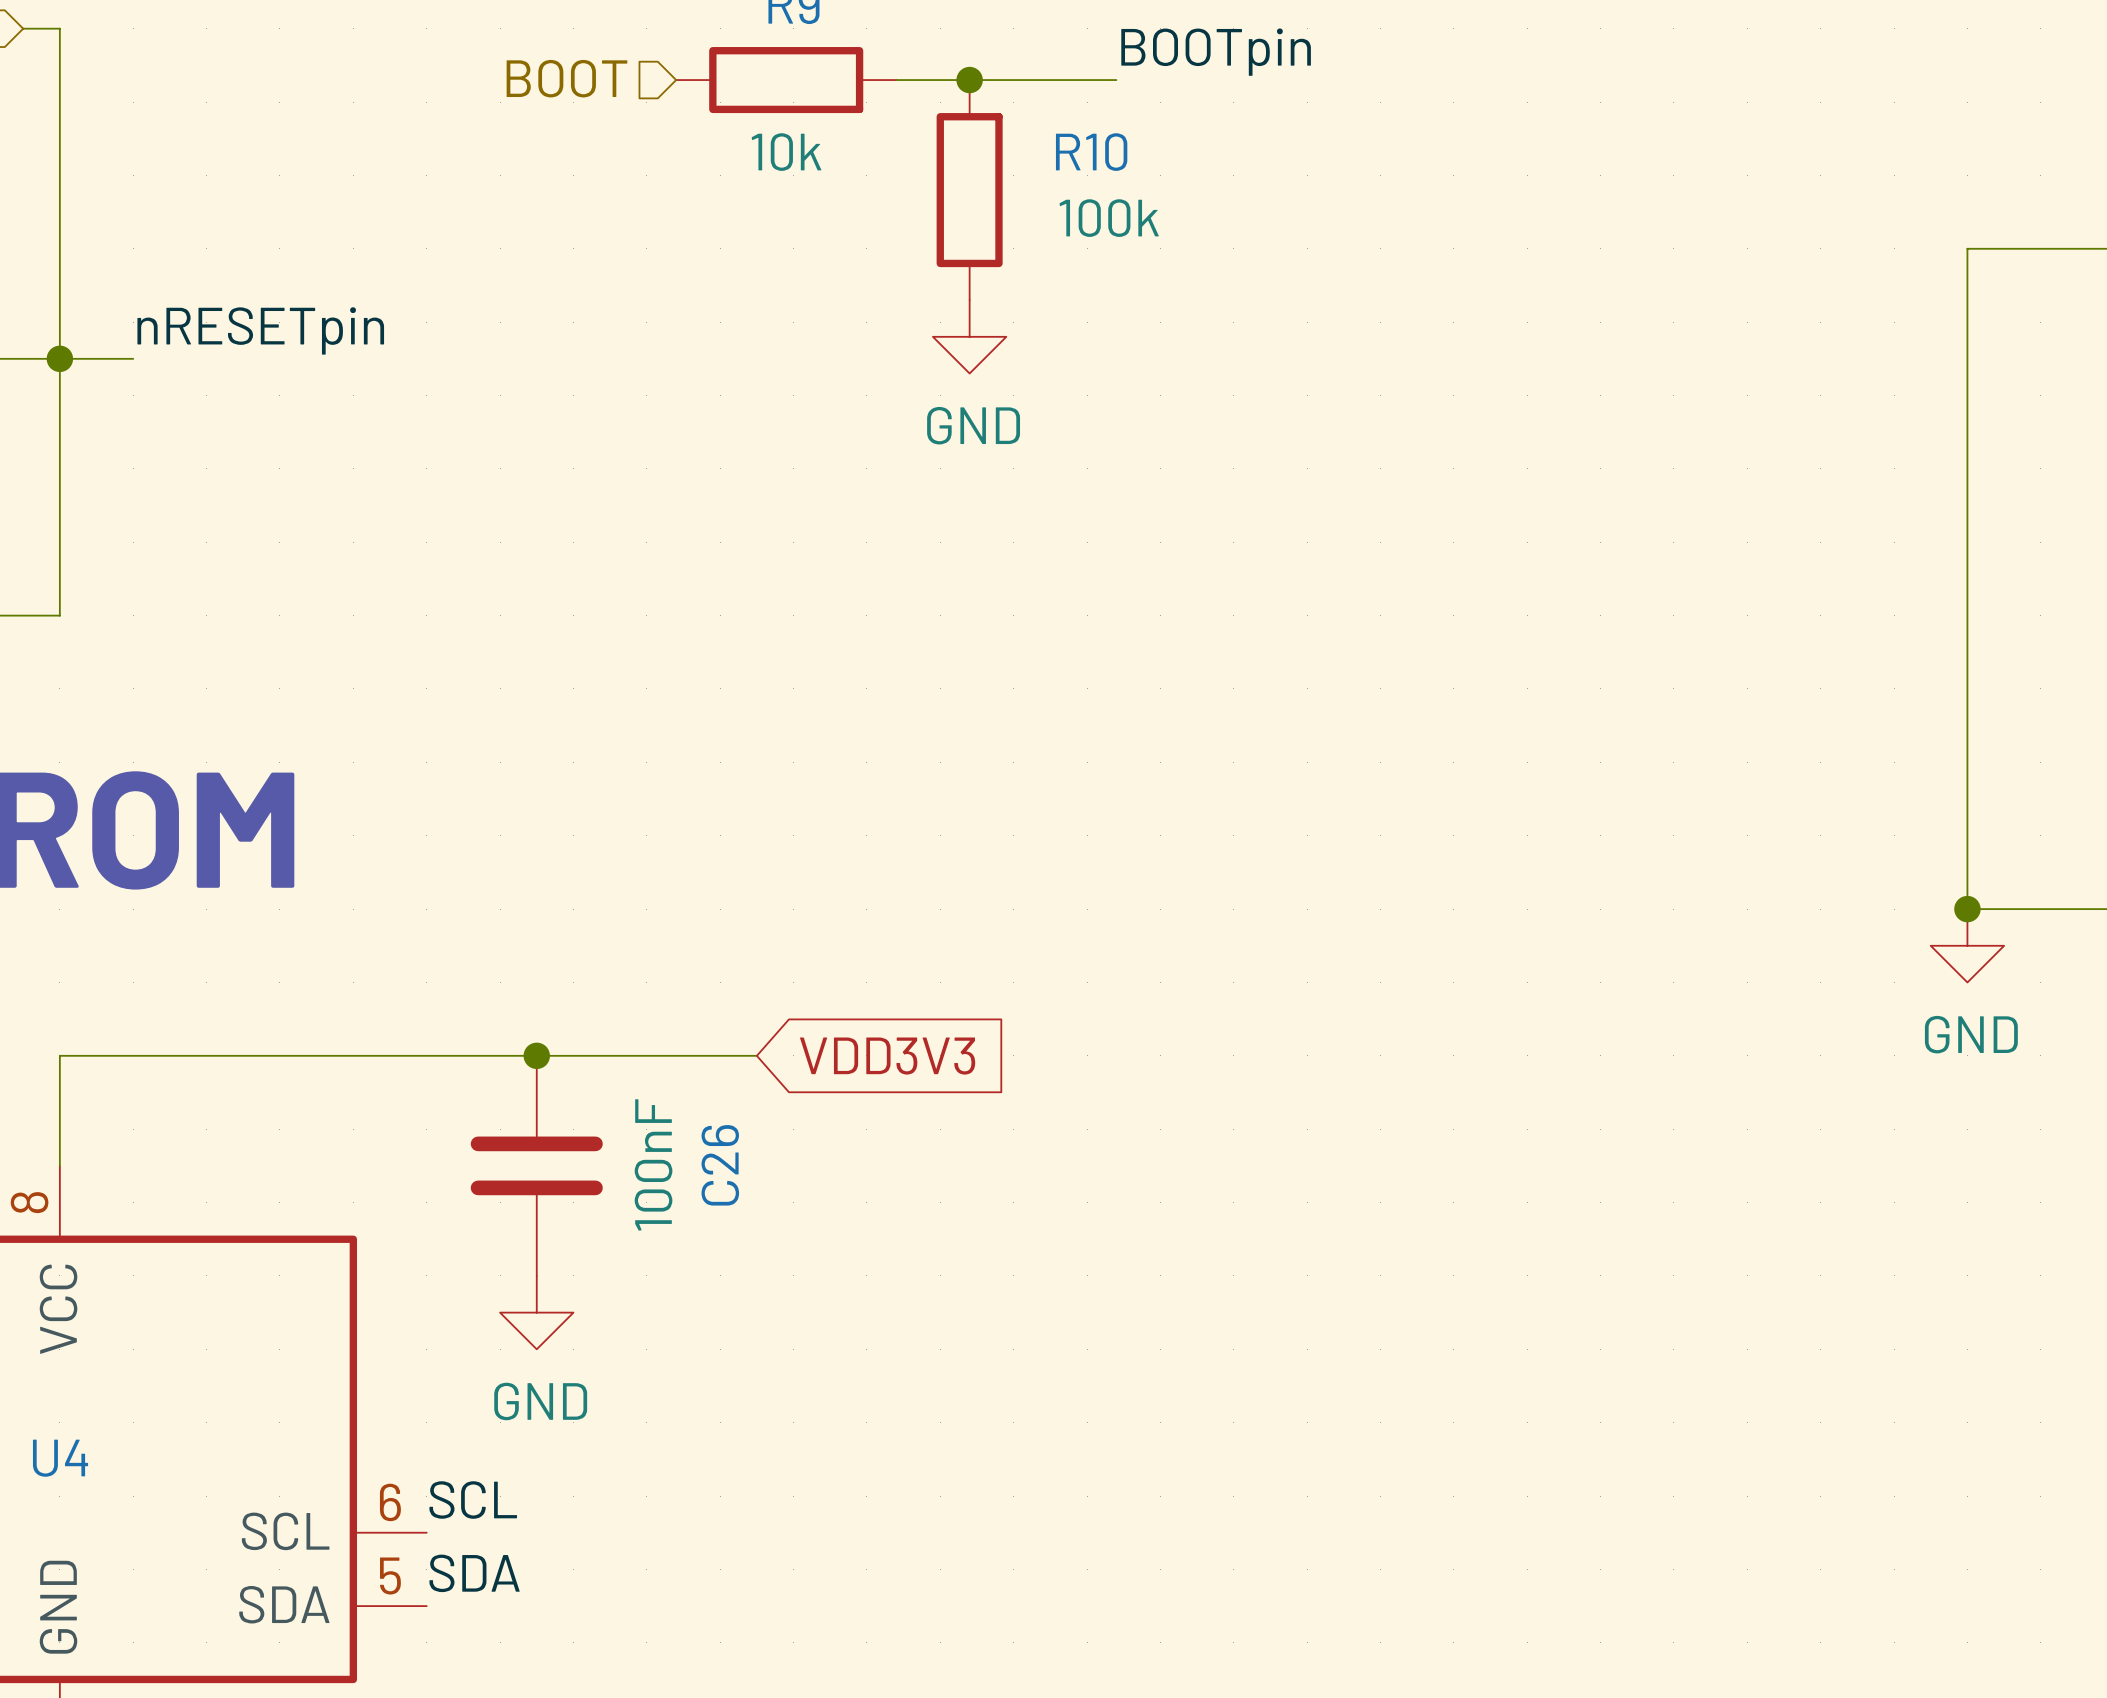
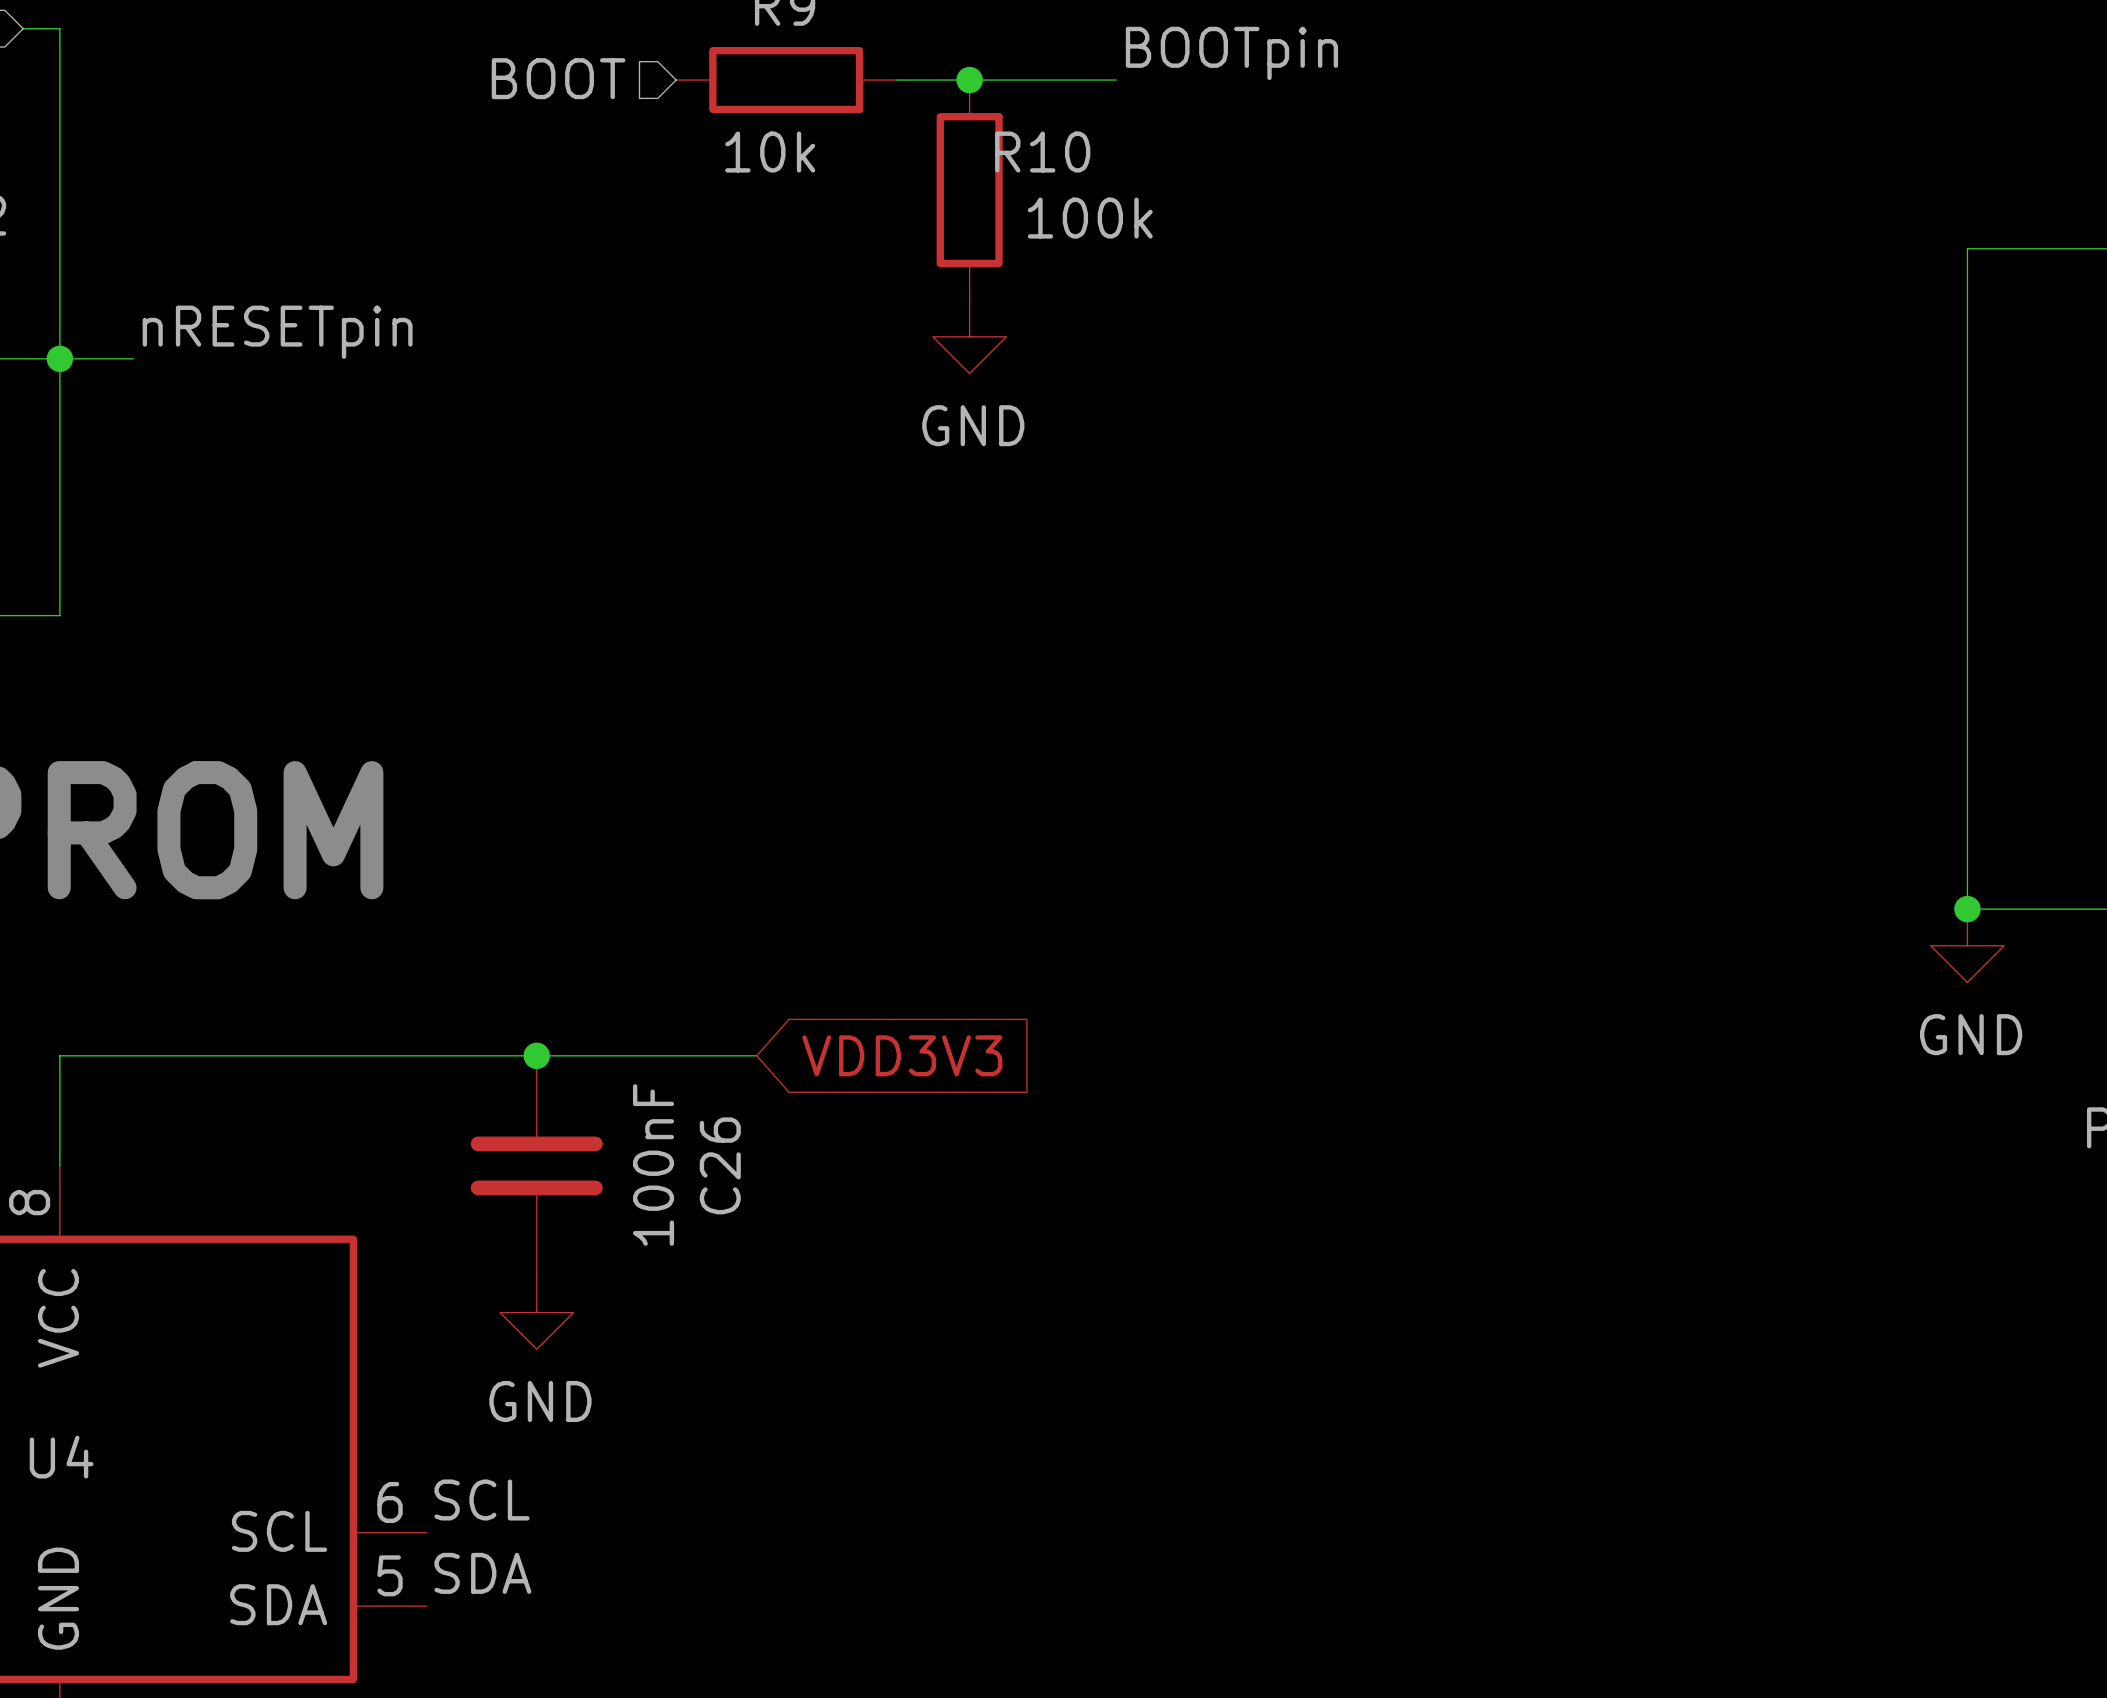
R10 name position: R10 (1091, 152) -> R10 (1042, 152)

